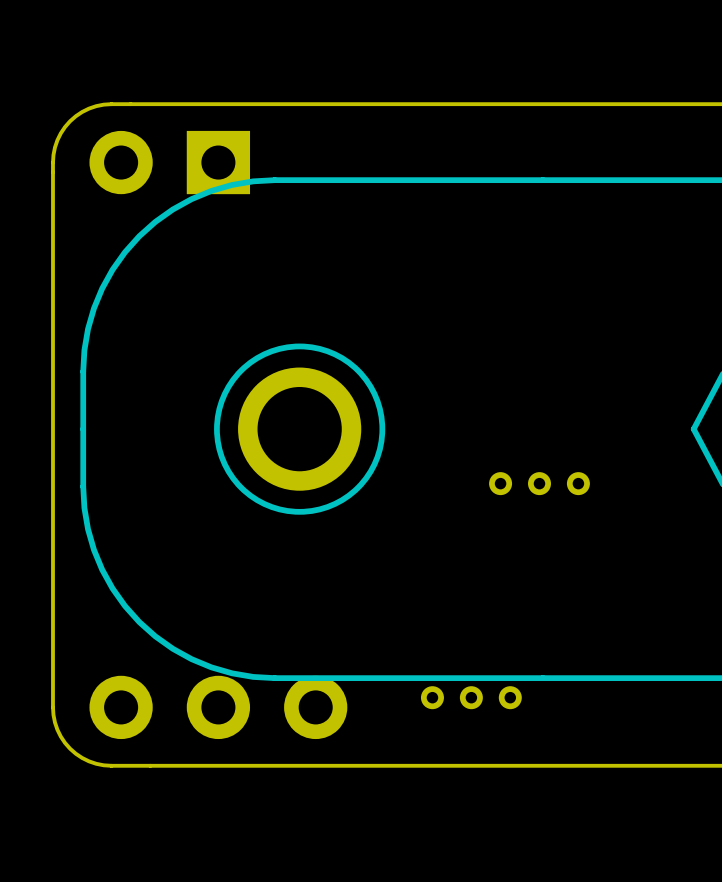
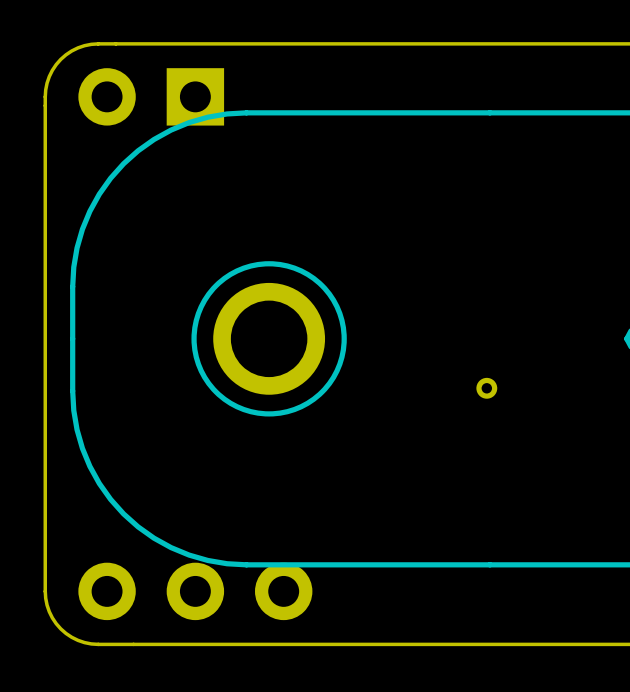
part: (500, 483) -> none
part: (578, 483) -> none
part: (432, 697) -> none
part: (471, 697) -> none
part: (510, 697) -> none

